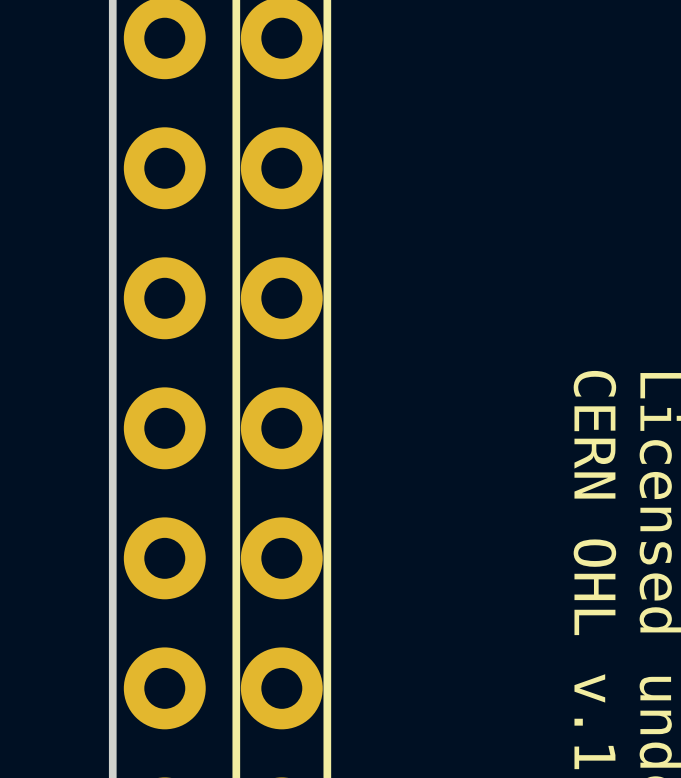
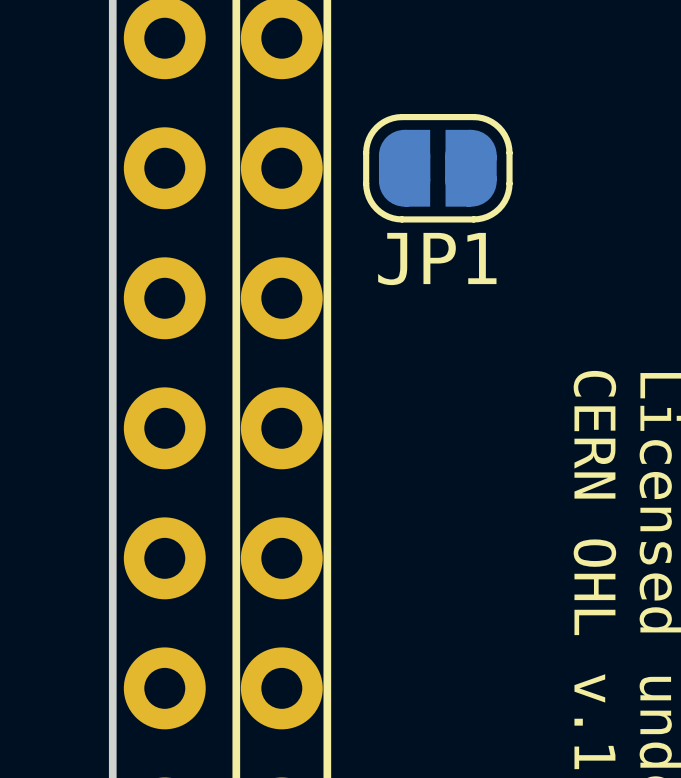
JP1: none -> (437, 168)

